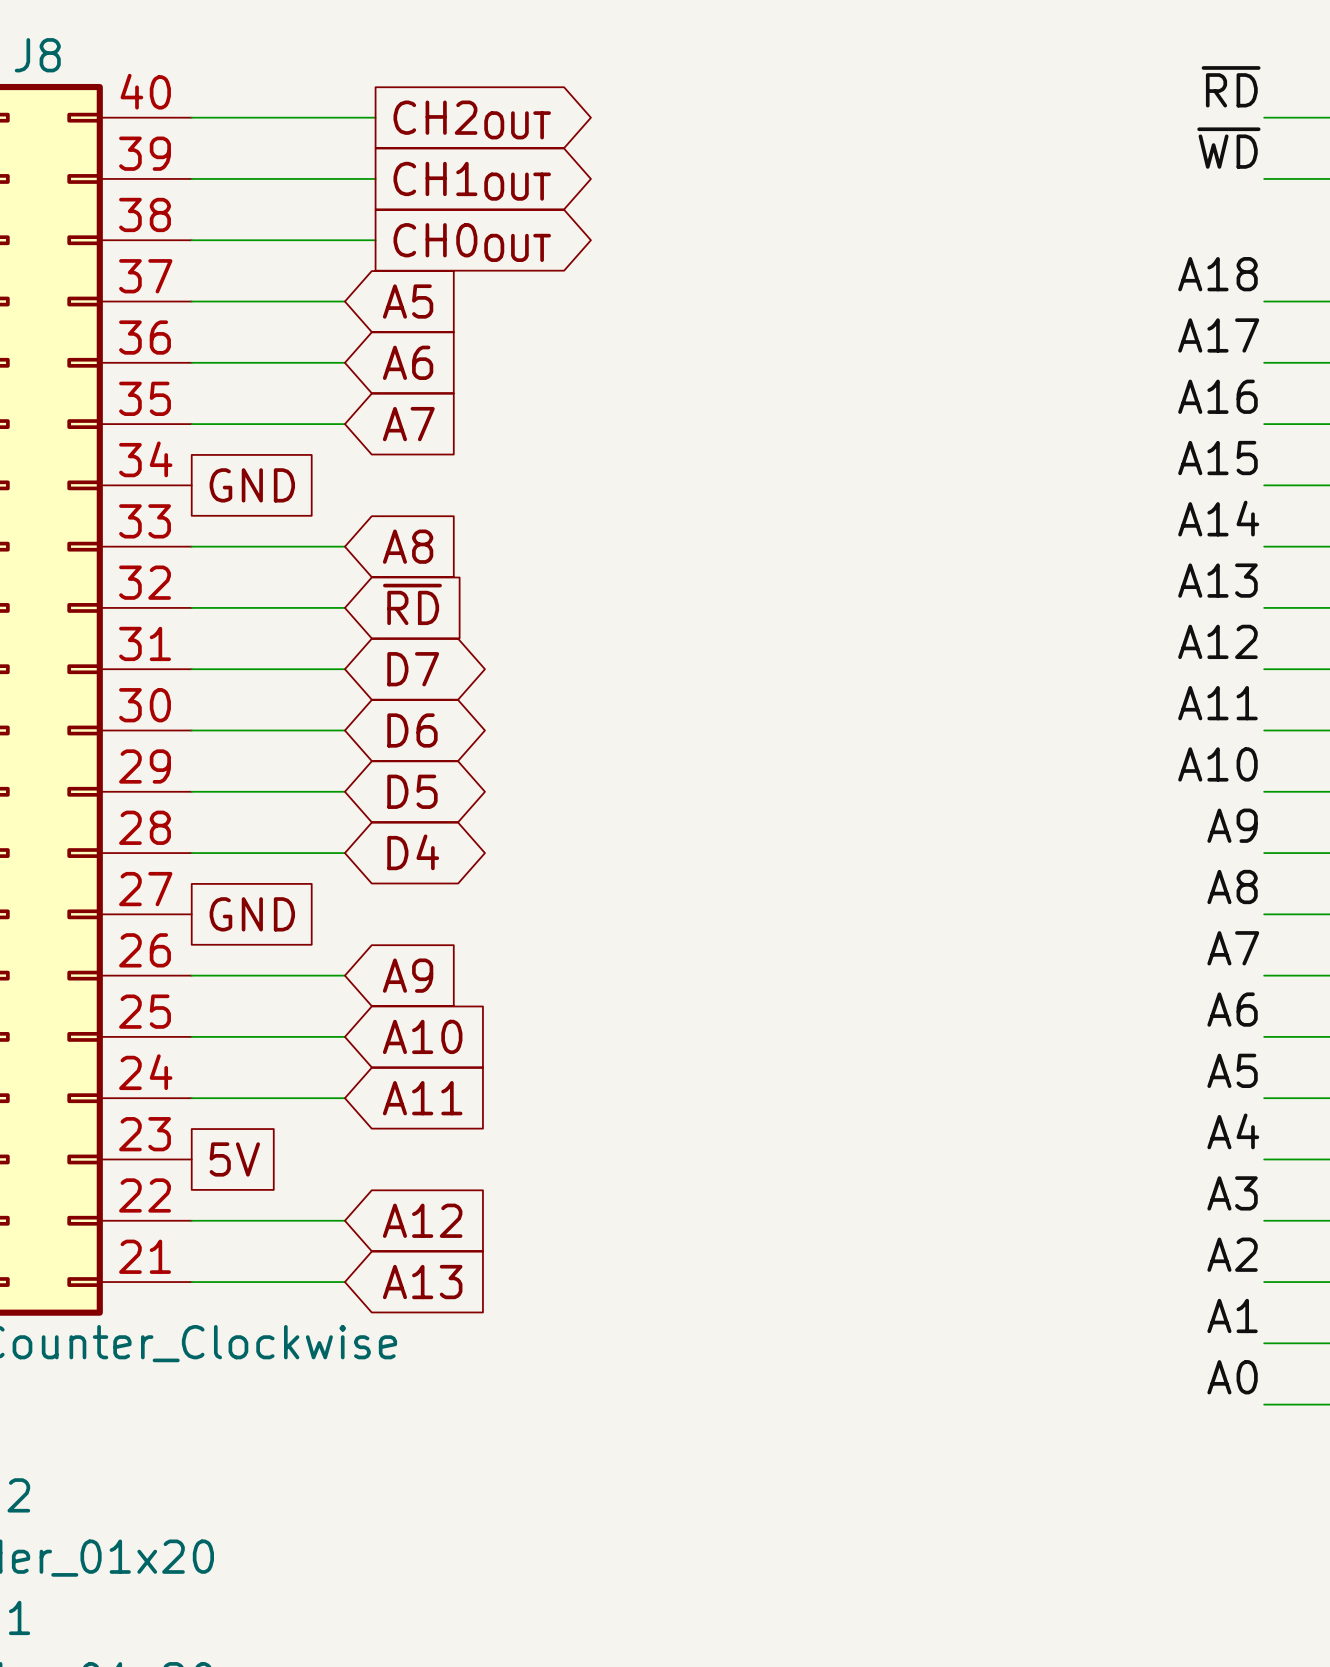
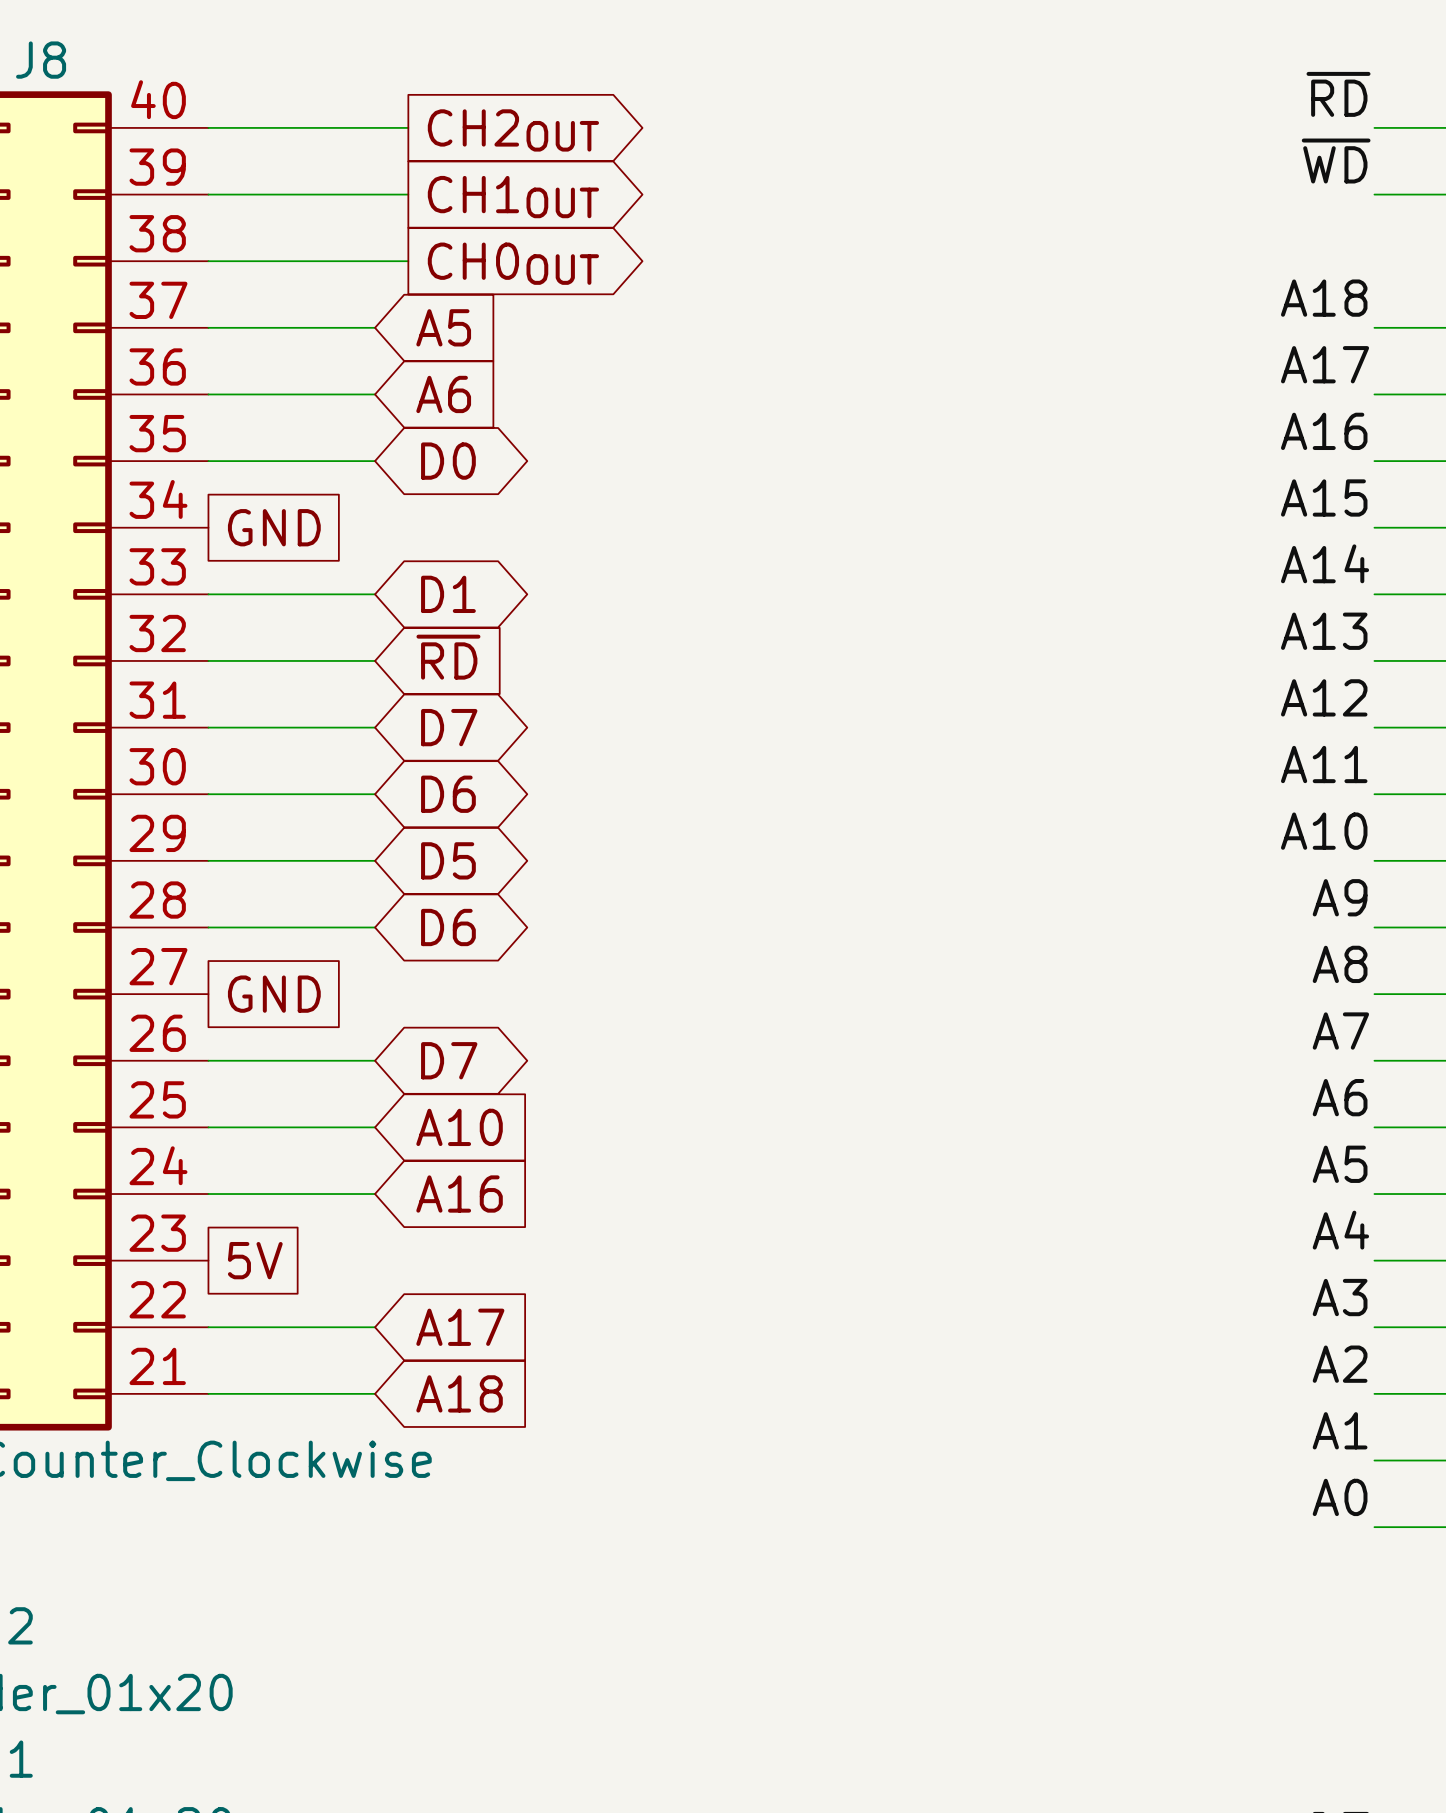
global label shape: input (408, 424) -> bidirectional (448, 461)
global label: A7 (408, 424) -> D0 (448, 461)
global label shape: input (408, 546) -> bidirectional (448, 594)
global label: A8 (408, 546) -> D1 (448, 594)
global label: D4 (413, 852) -> D6 (448, 927)
global label shape: input (408, 975) -> bidirectional (449, 1060)
global label: A9 (408, 975) -> D7 (449, 1060)
global label: A11 (422, 1098) -> A16 (459, 1194)
global label: A12 (422, 1220) -> A17 (460, 1327)
global label: A13 (422, 1282) -> A18 (459, 1393)

